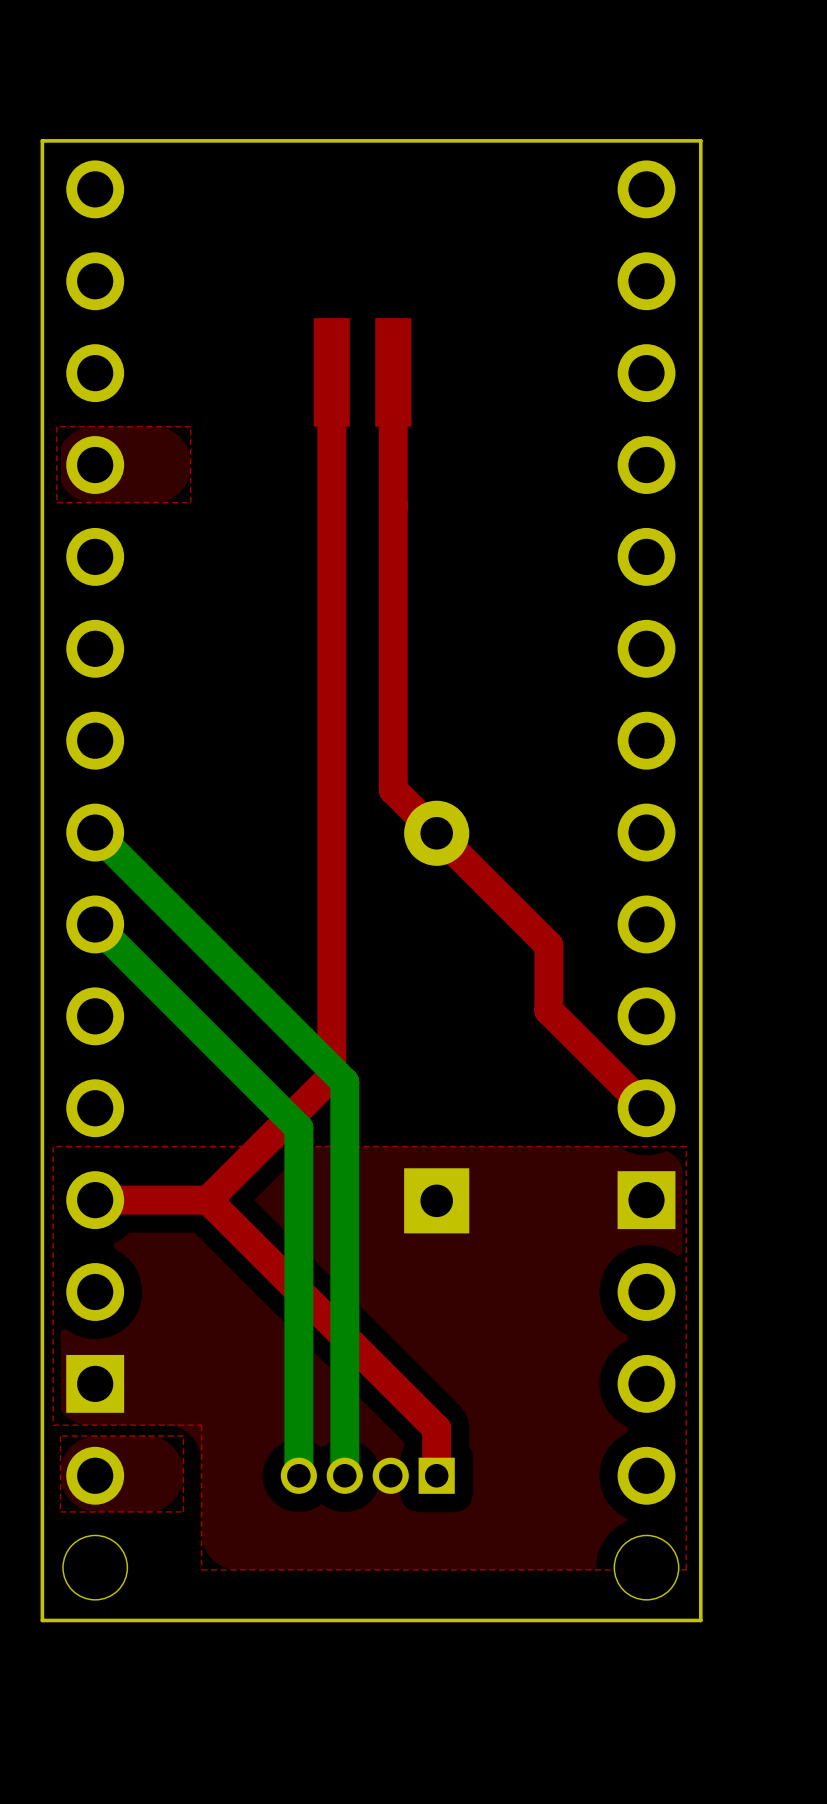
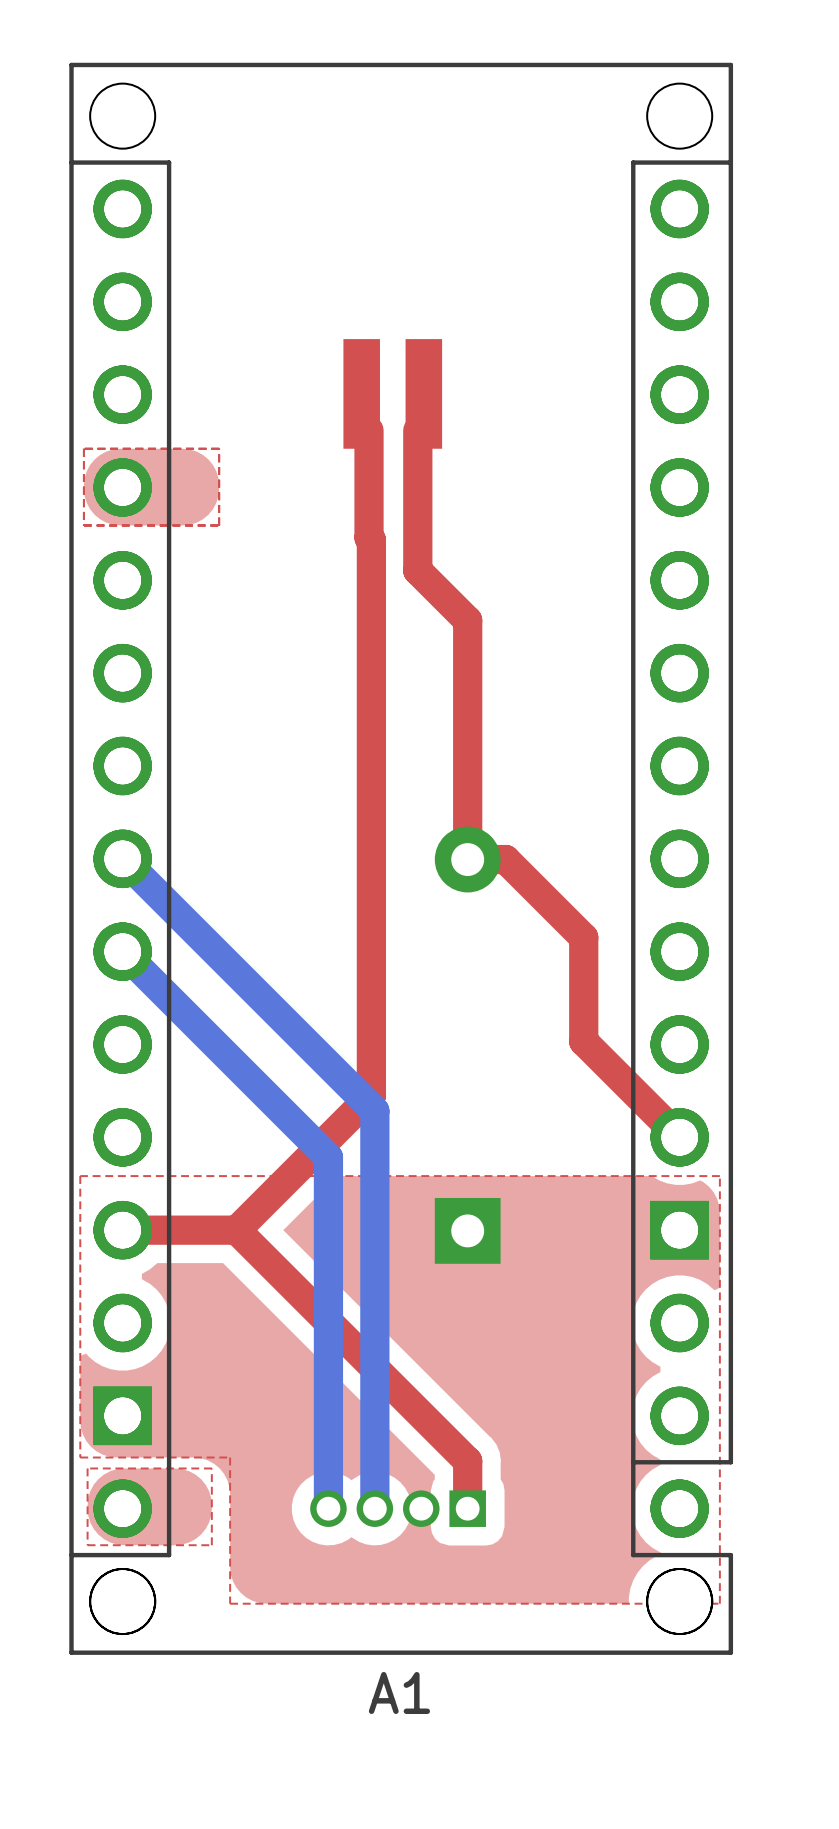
board edge: (700, 140) (700, 1620) (42, 1620) (42, 140) (700, 140) -> none
top track: (331, 372) (331, 1076) -> (369, 430) (369, 537) (371, 540) (371, 1095) (361, 1105)
top track: (393, 372) (393, 789) (548, 945) (548, 1010) (551, 1013) -> (417, 430) (417, 570) (467, 620) (467, 859) (505, 859) (583, 937) (583, 1041)
A1: none -> (401, 858)

